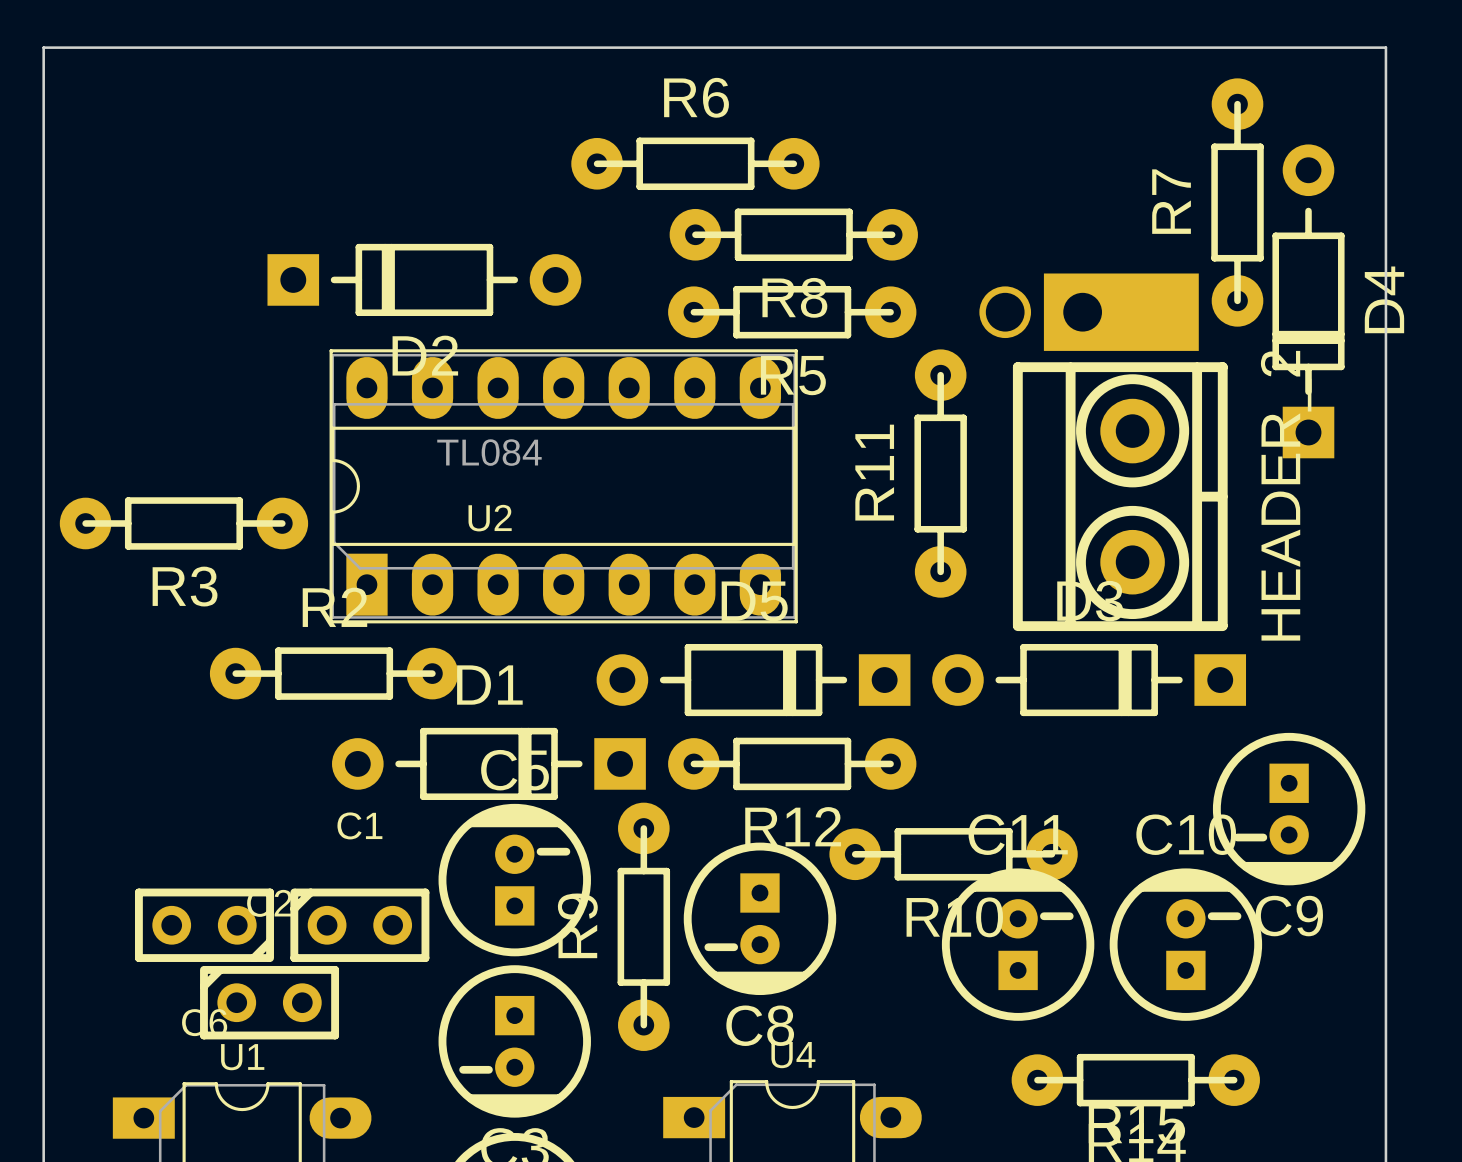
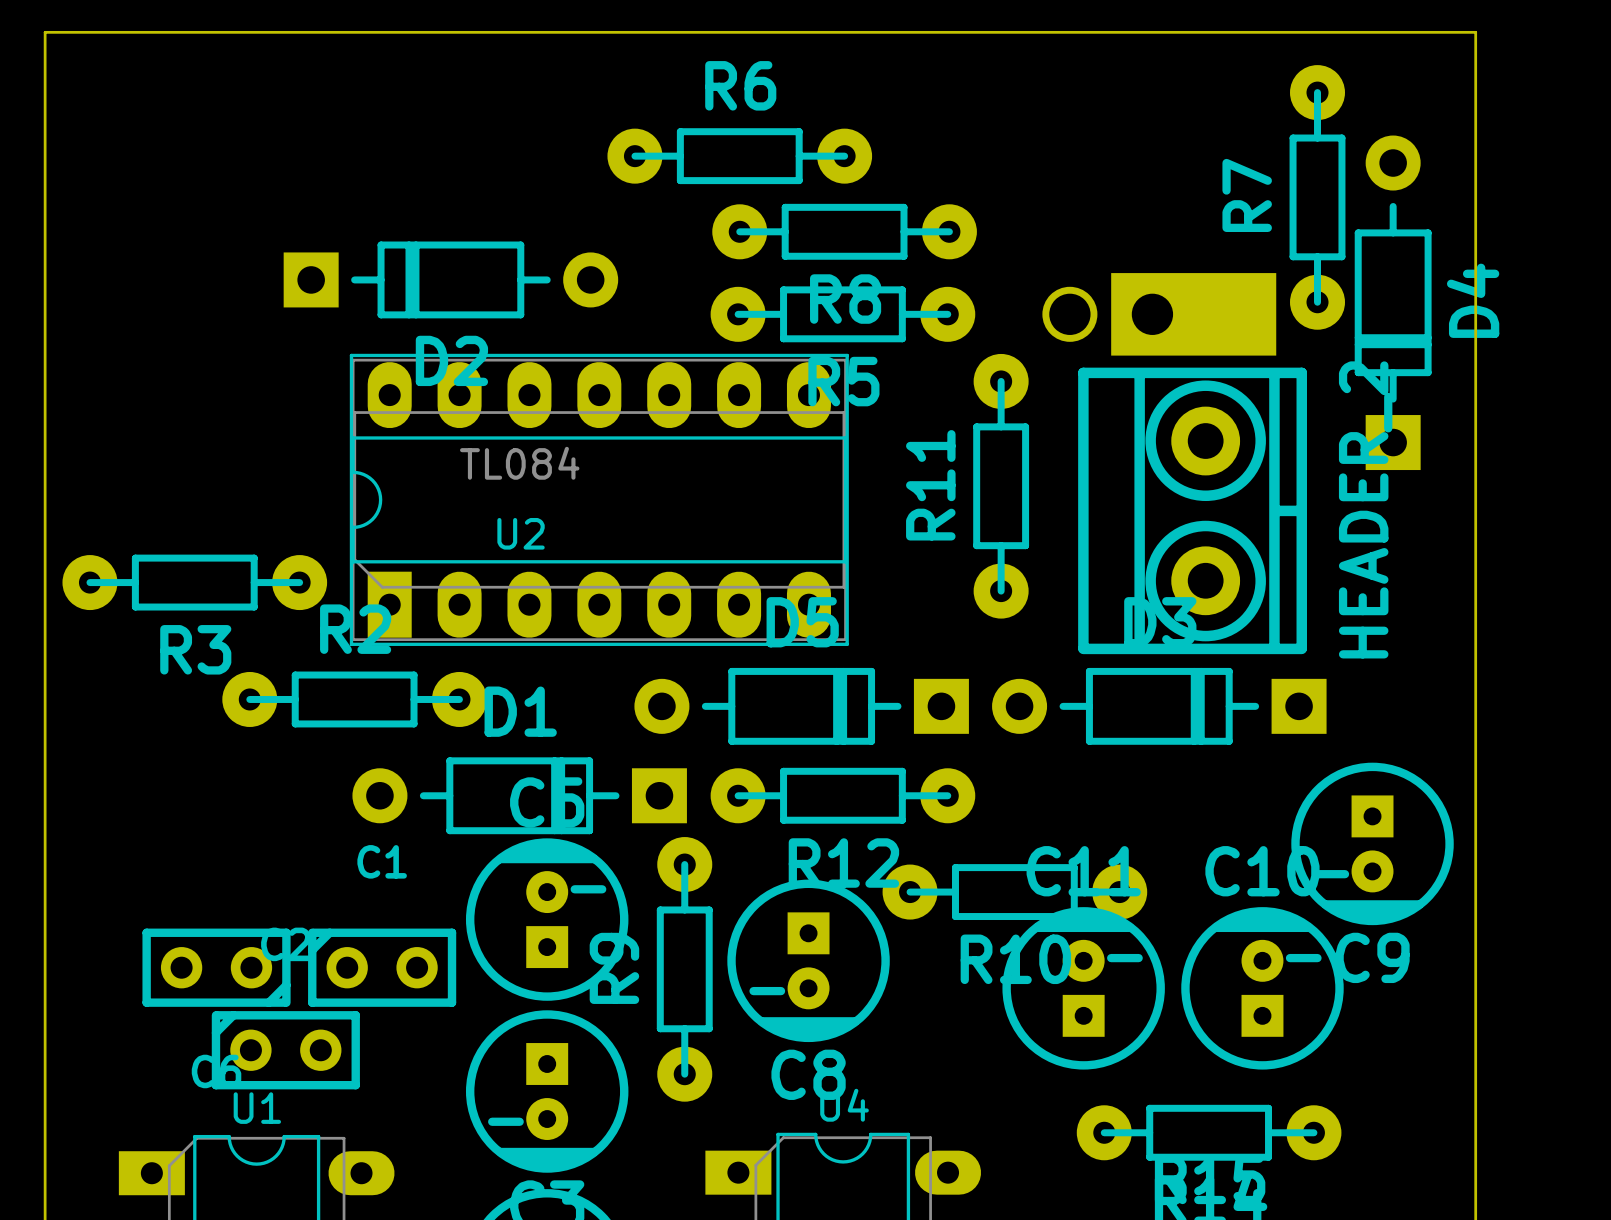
R3 position: (183, 523) -> (194, 582)

